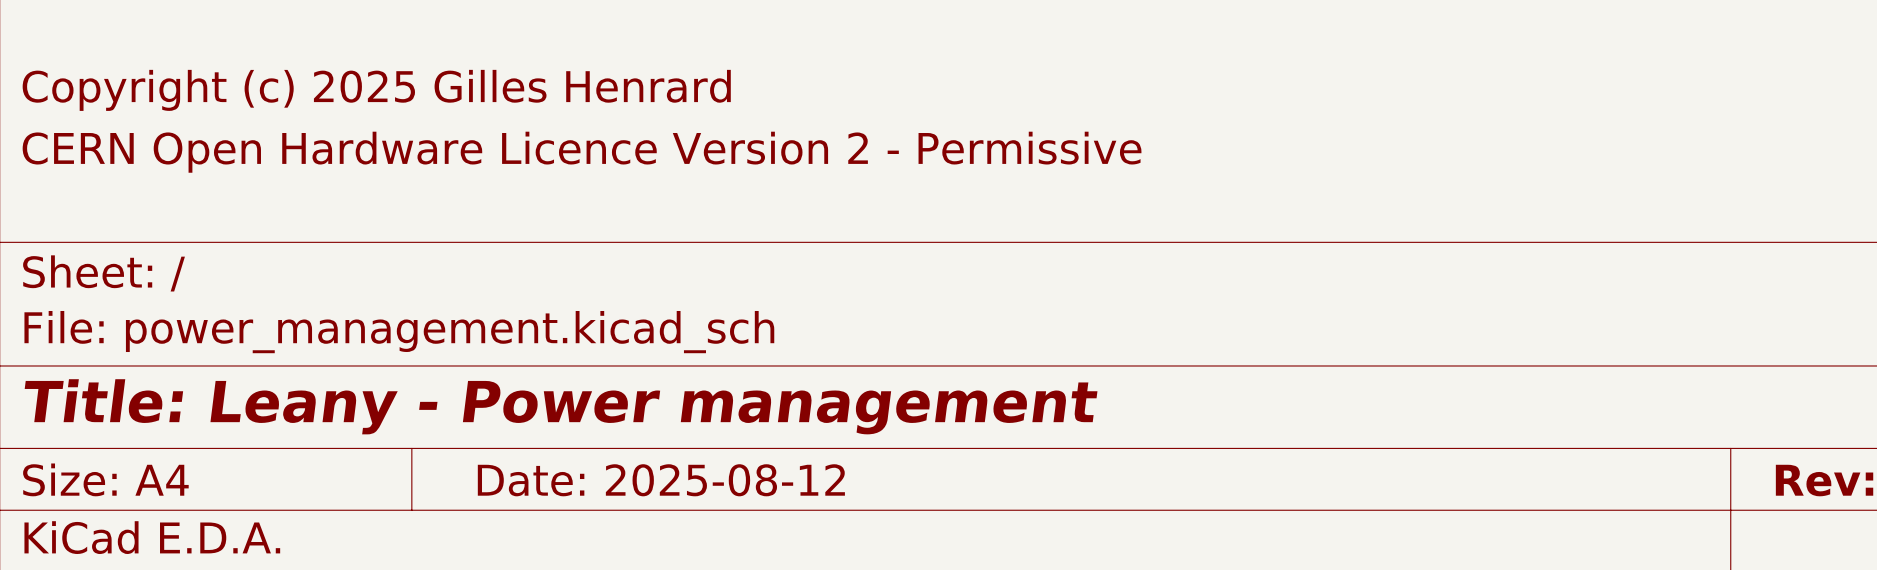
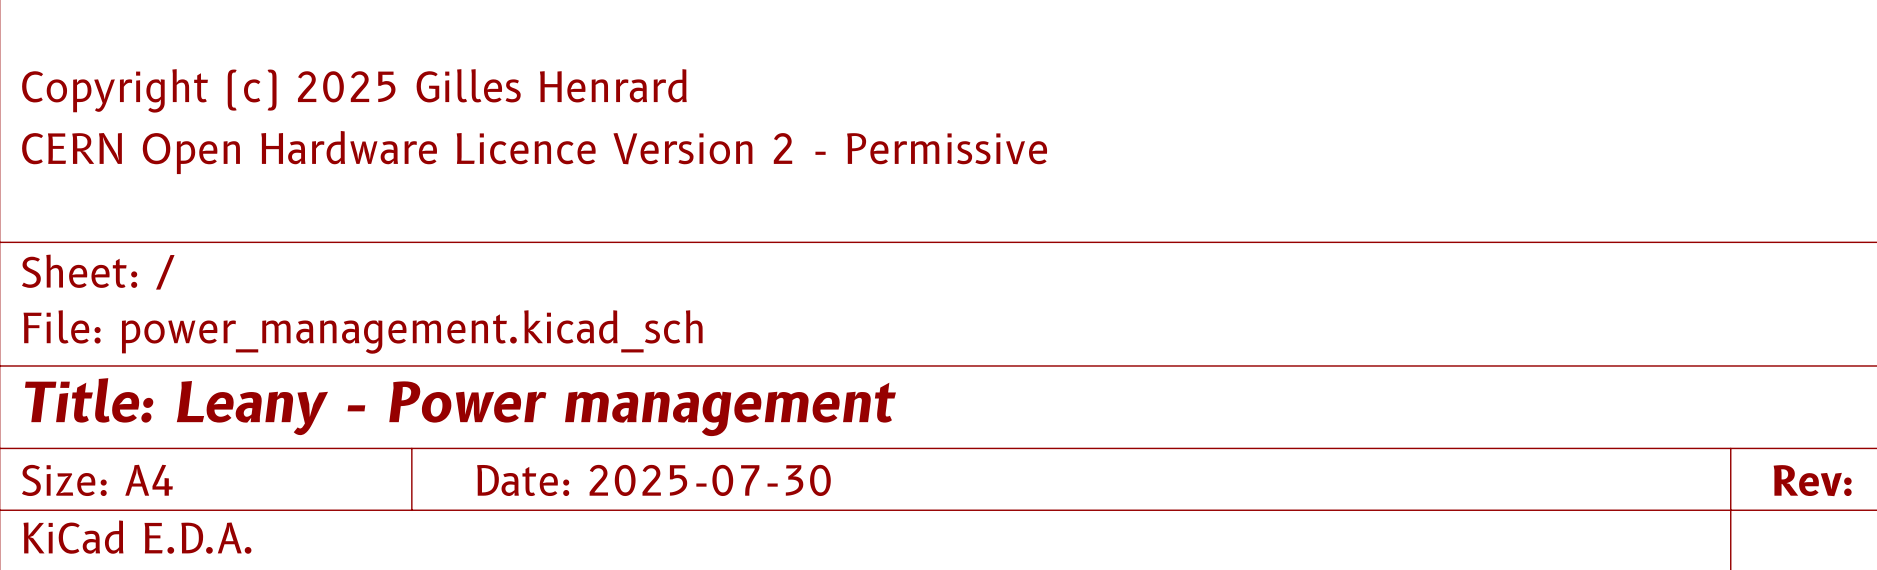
title block: Date: 2025-08-12 (661, 480) -> Date: 2025-07-30 (653, 480)

